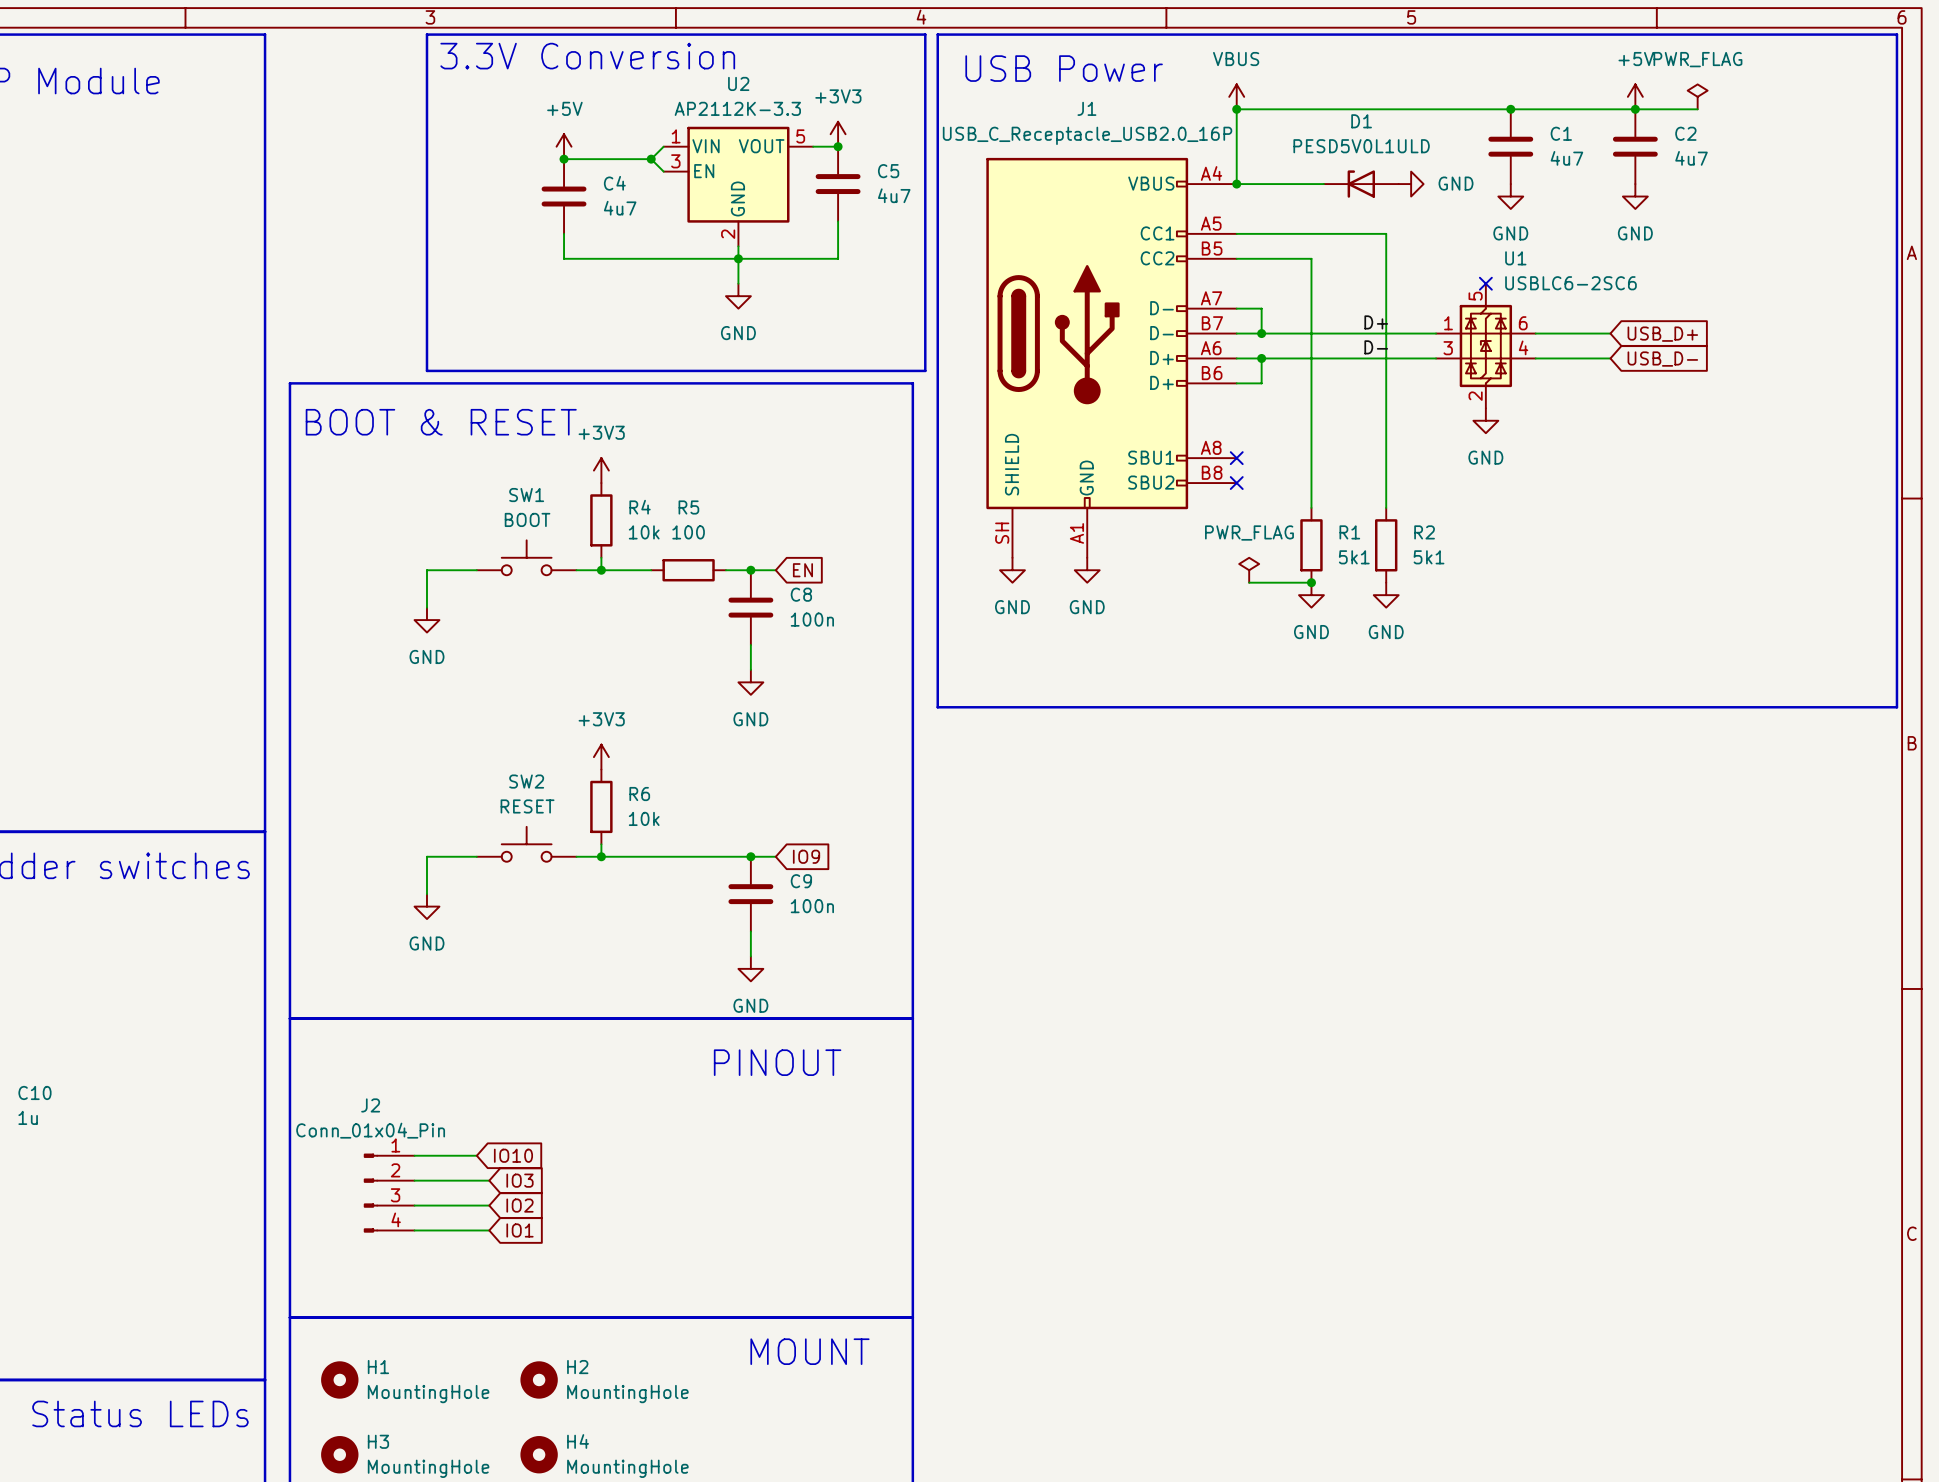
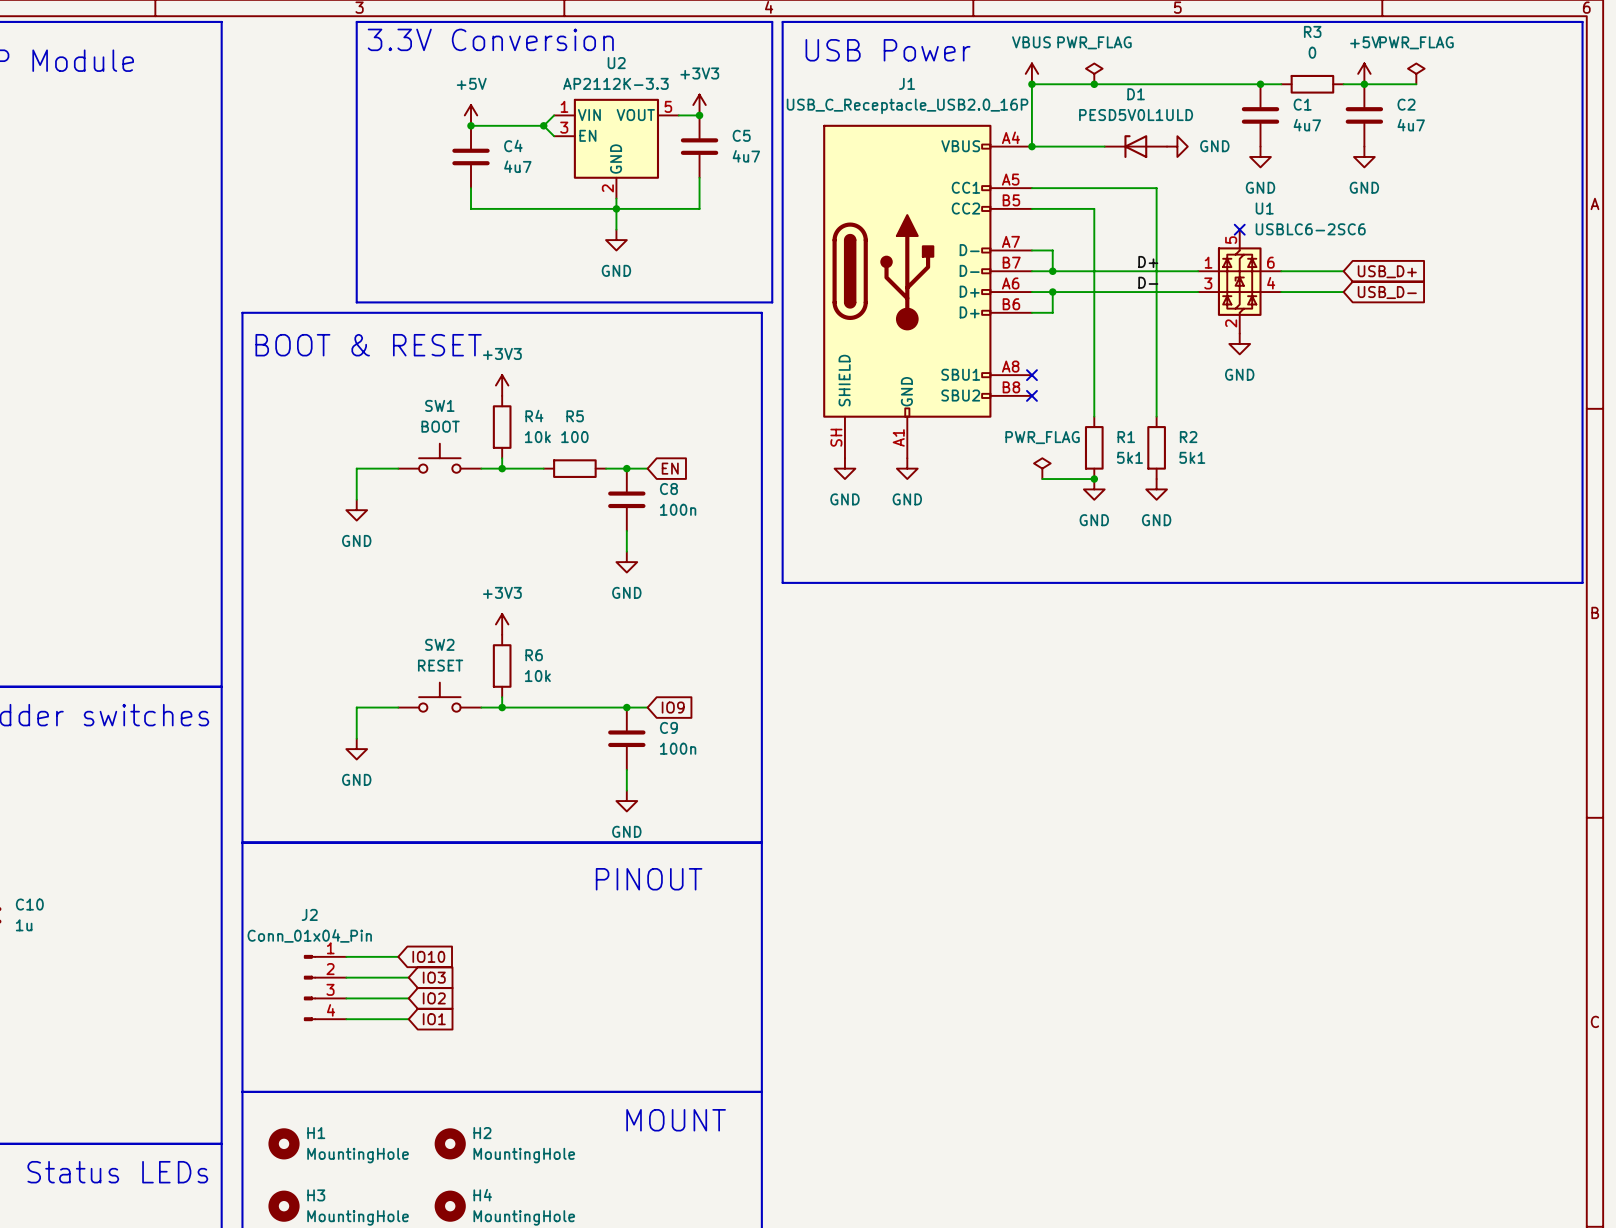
power symbol: none -> PWR_FLAG (1094, 73)
junction: none -> (1094, 84)
wire: (1535, 109) (1610, 109) -> none
R3: none -> 0 (1312, 84)

